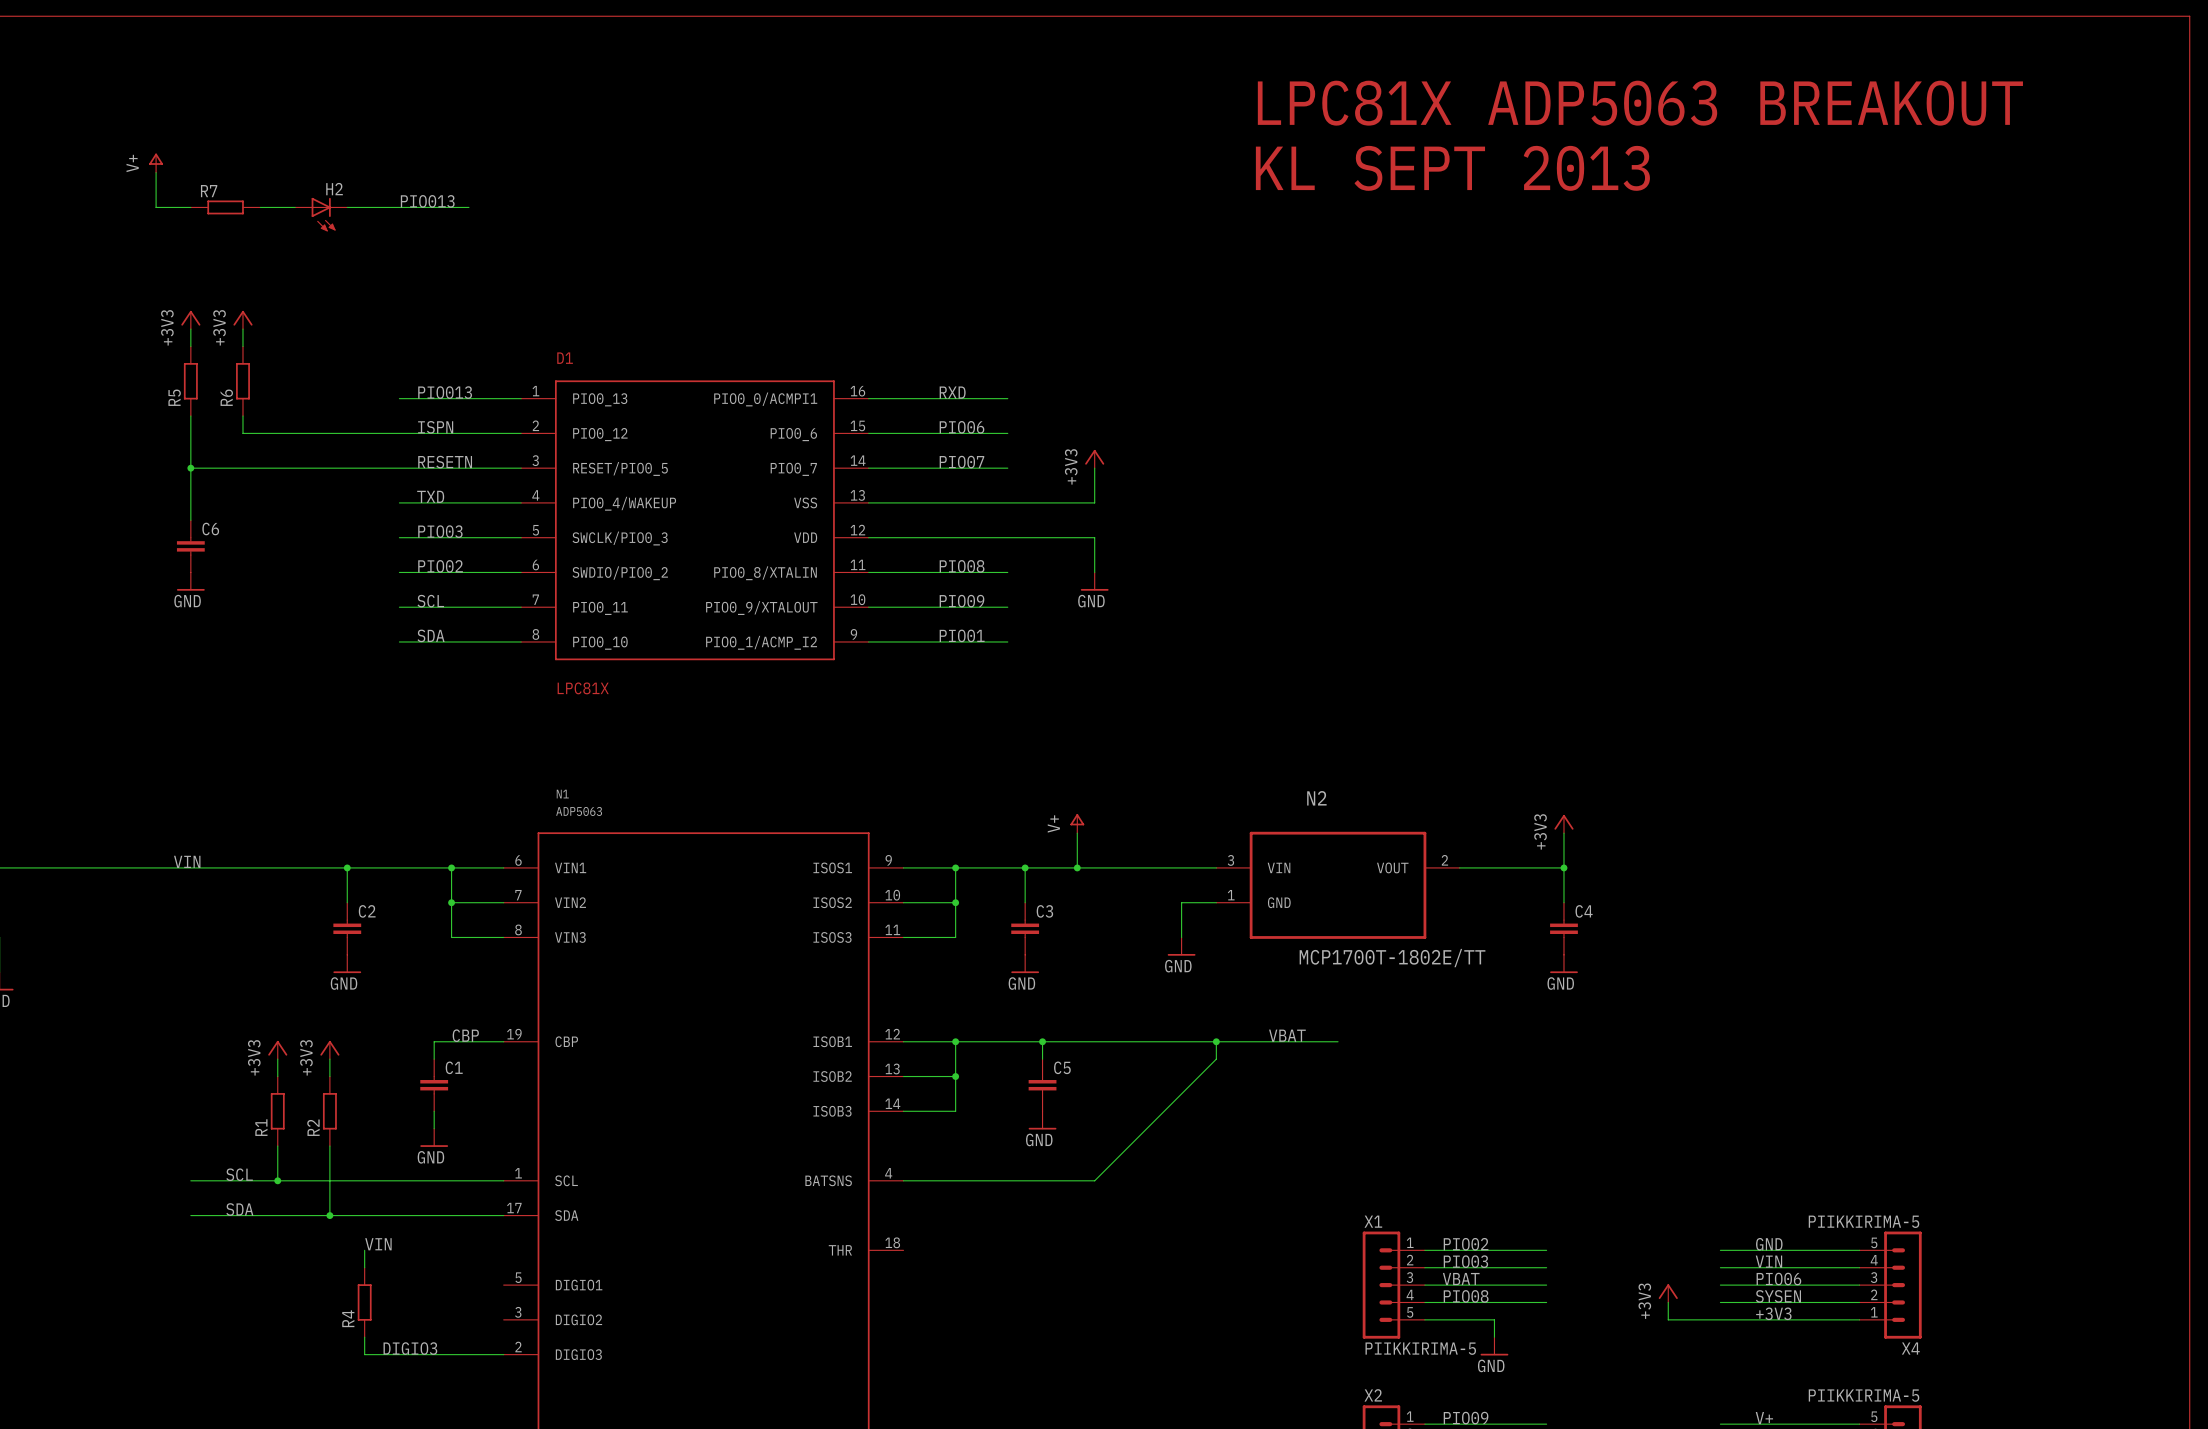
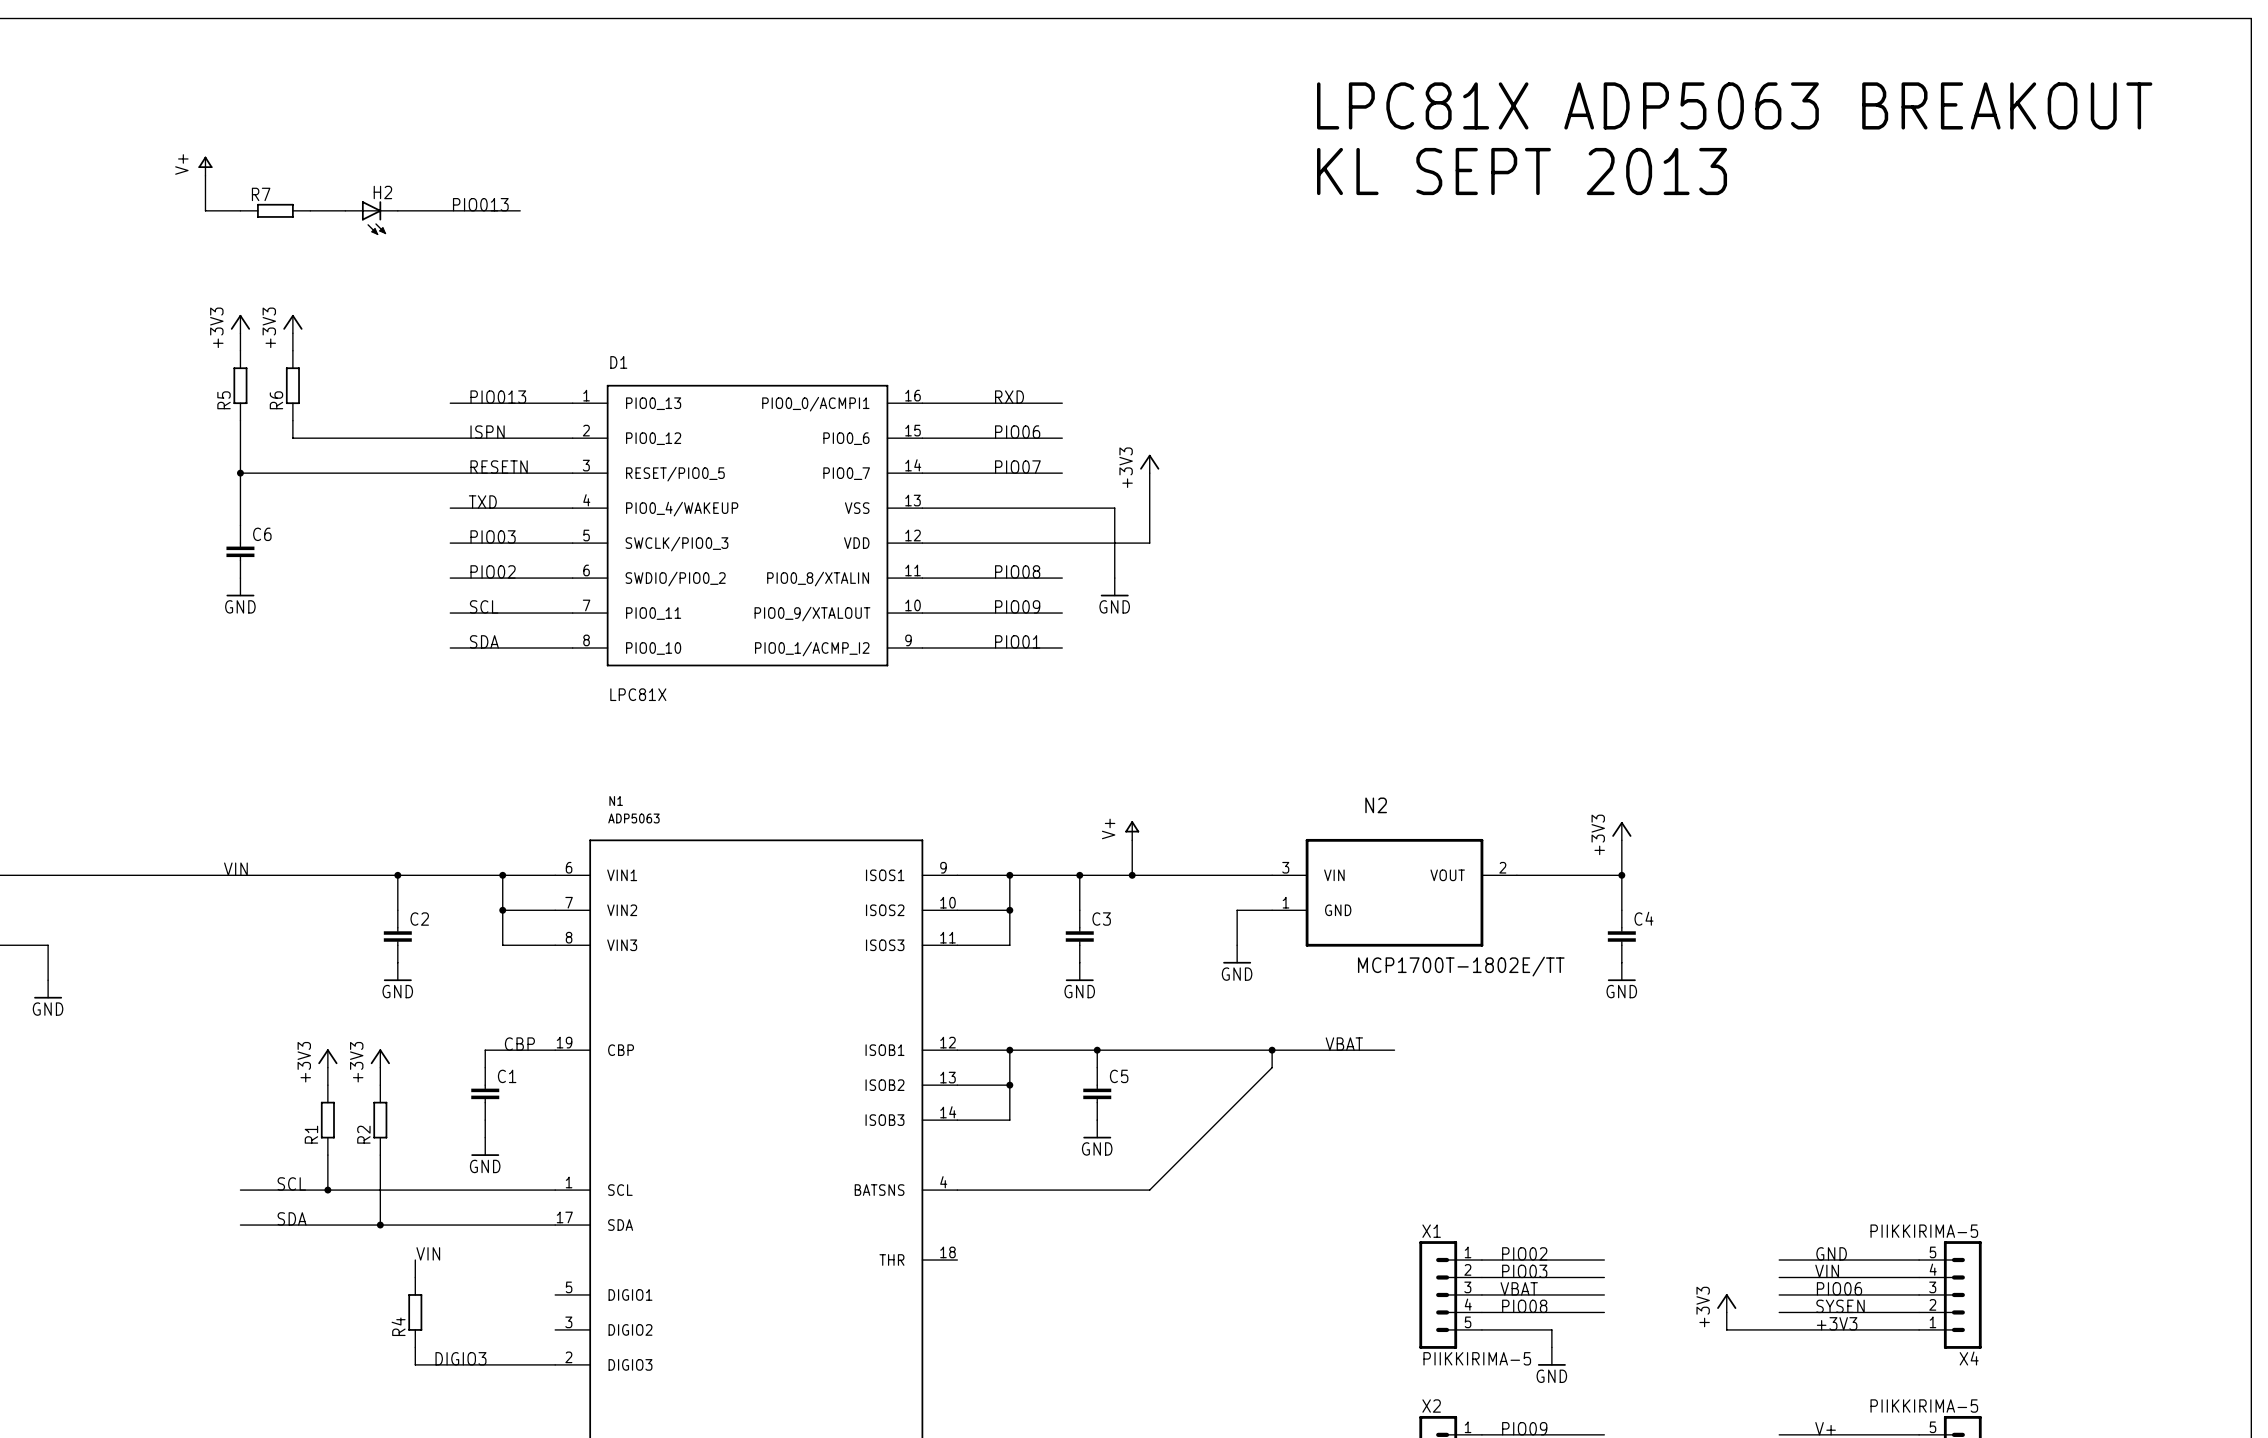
wire: (1059, 502) (1094, 502) -> (1149, 543) (1149, 508)
wire: none -> (1114, 508) (1114, 578)
wire: (1094, 537) (1094, 572) -> none
power symbol position: GND (1094, 581) -> GND (1114, 587)

